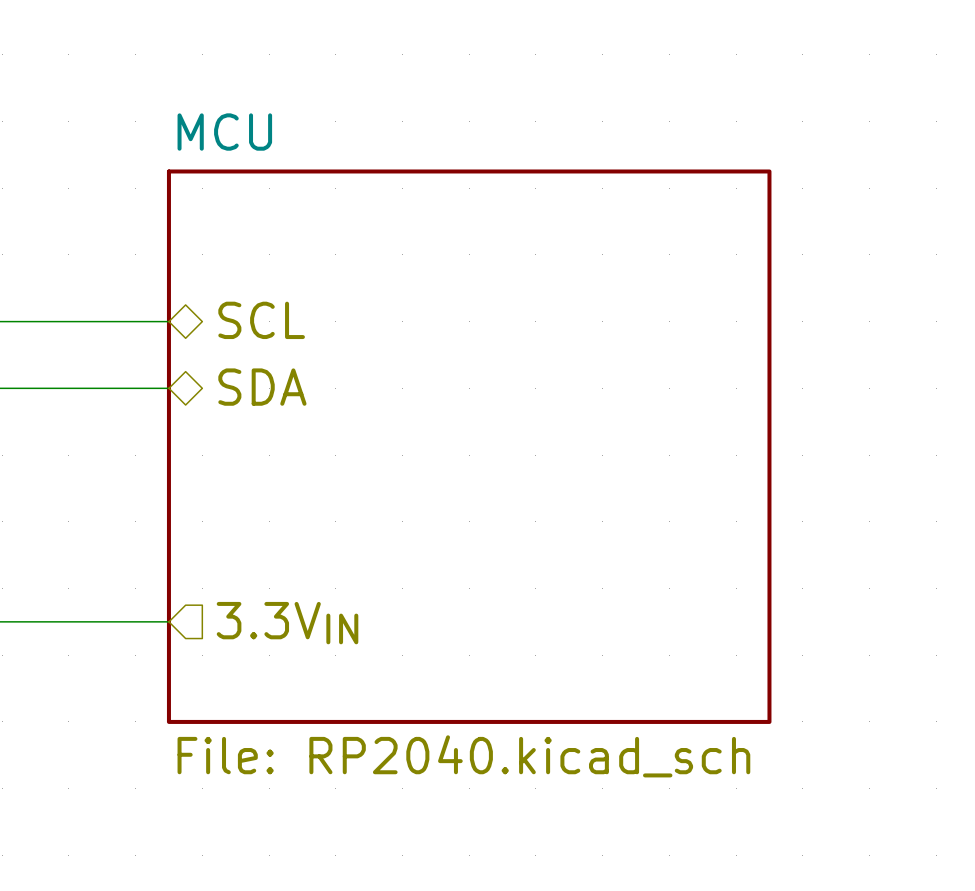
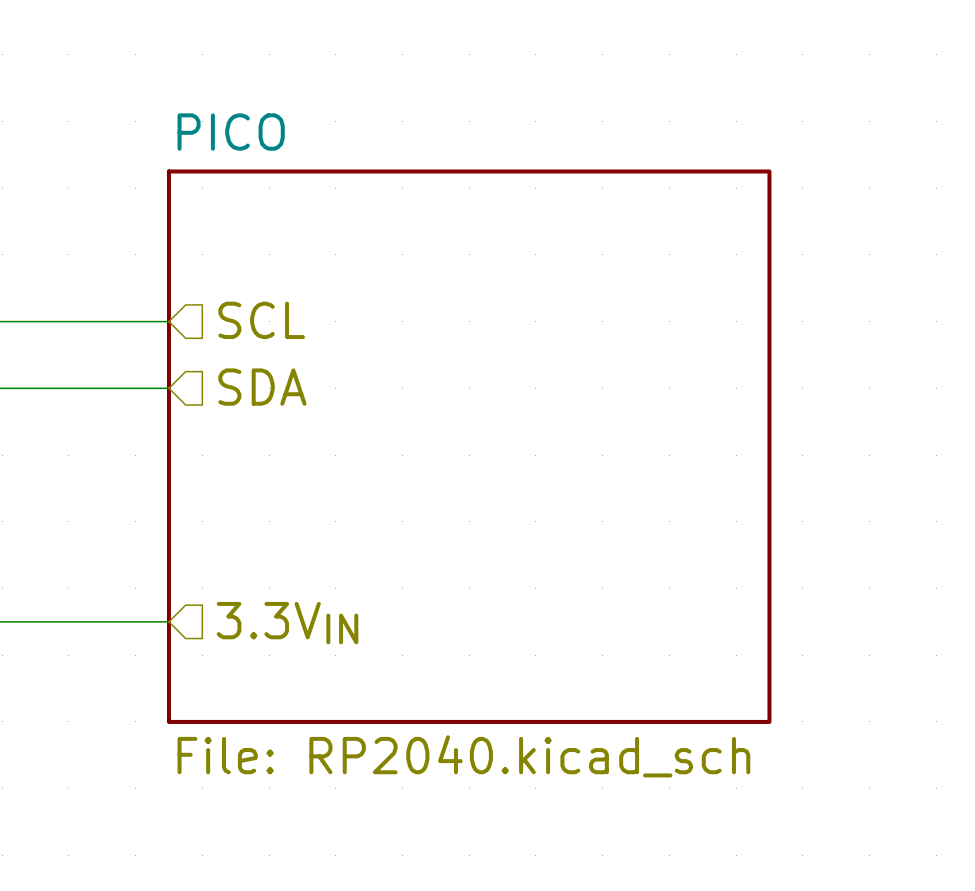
sheet MCU name: MCU (224, 132) -> PICO (231, 132)
hierarchical label shape: bidirectional (261, 320) -> input (261, 320)
hierarchical label shape: bidirectional (262, 387) -> input (262, 387)

